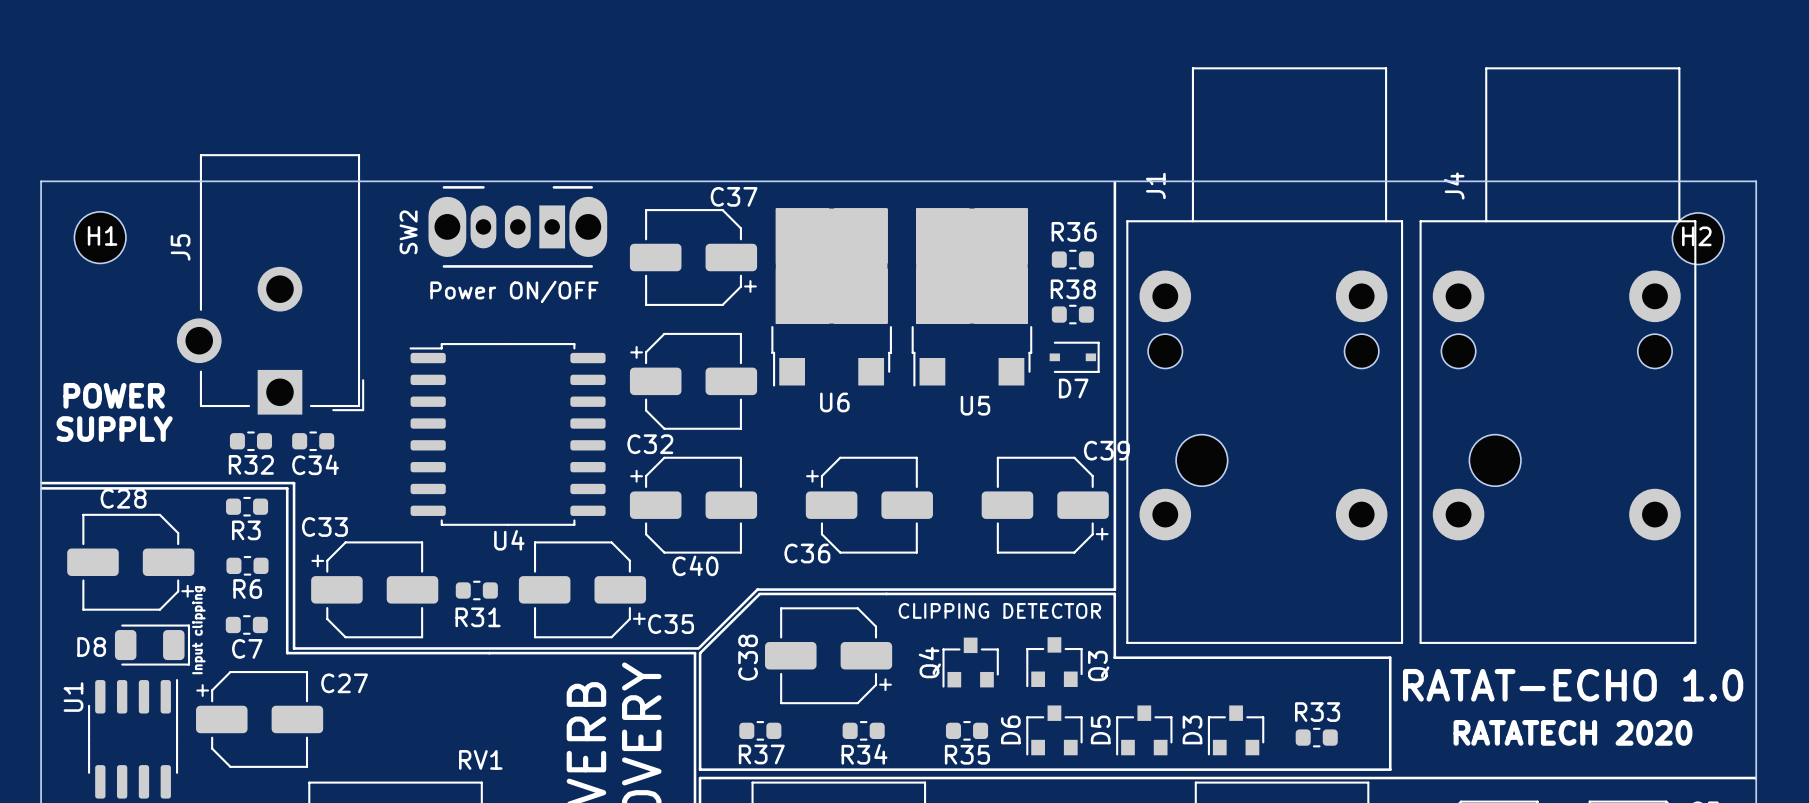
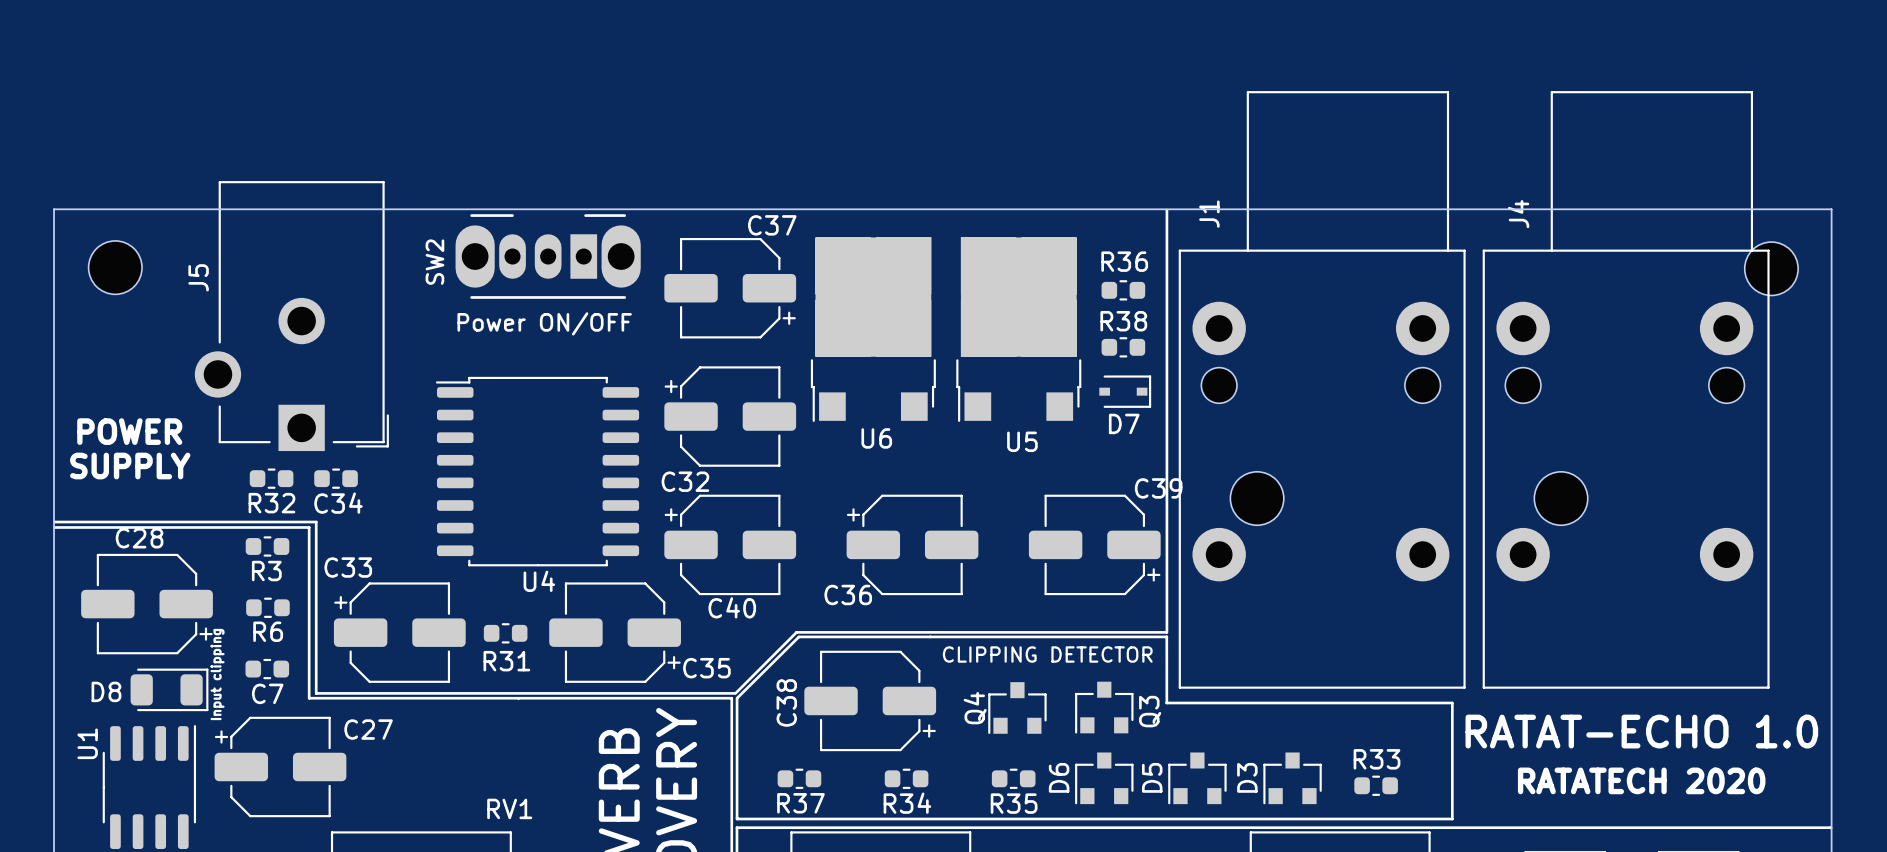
H1 name: H1 (102, 235) -> none
H2 name: H2 (1696, 236) -> none

